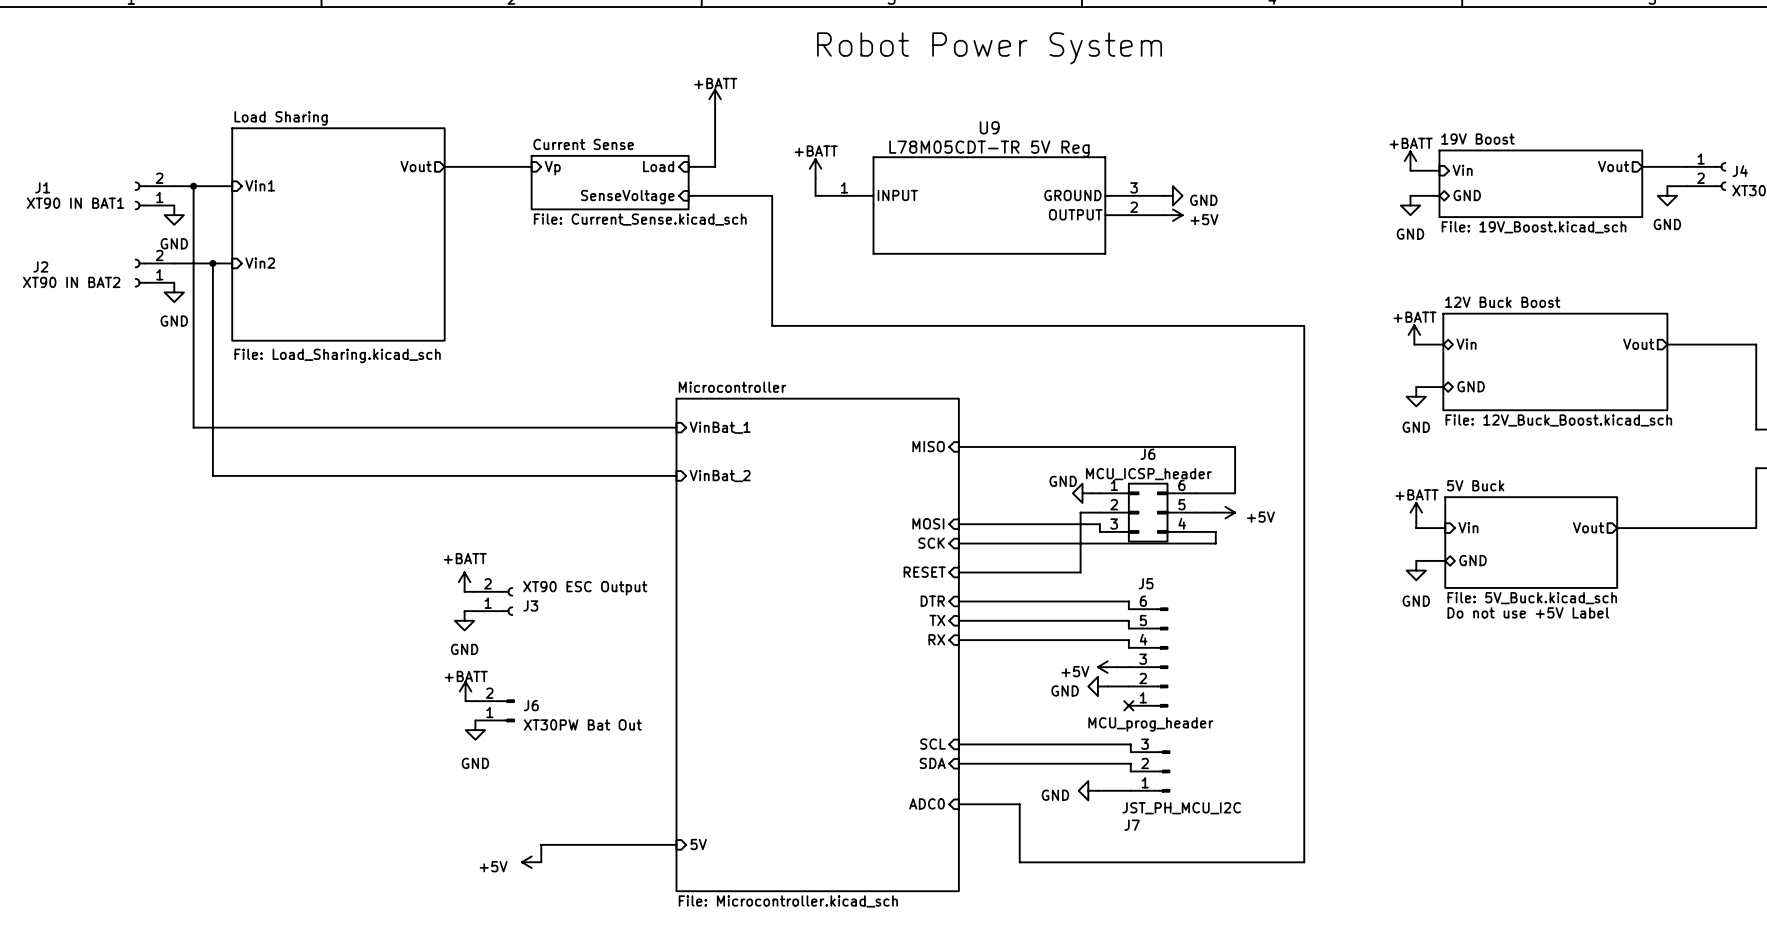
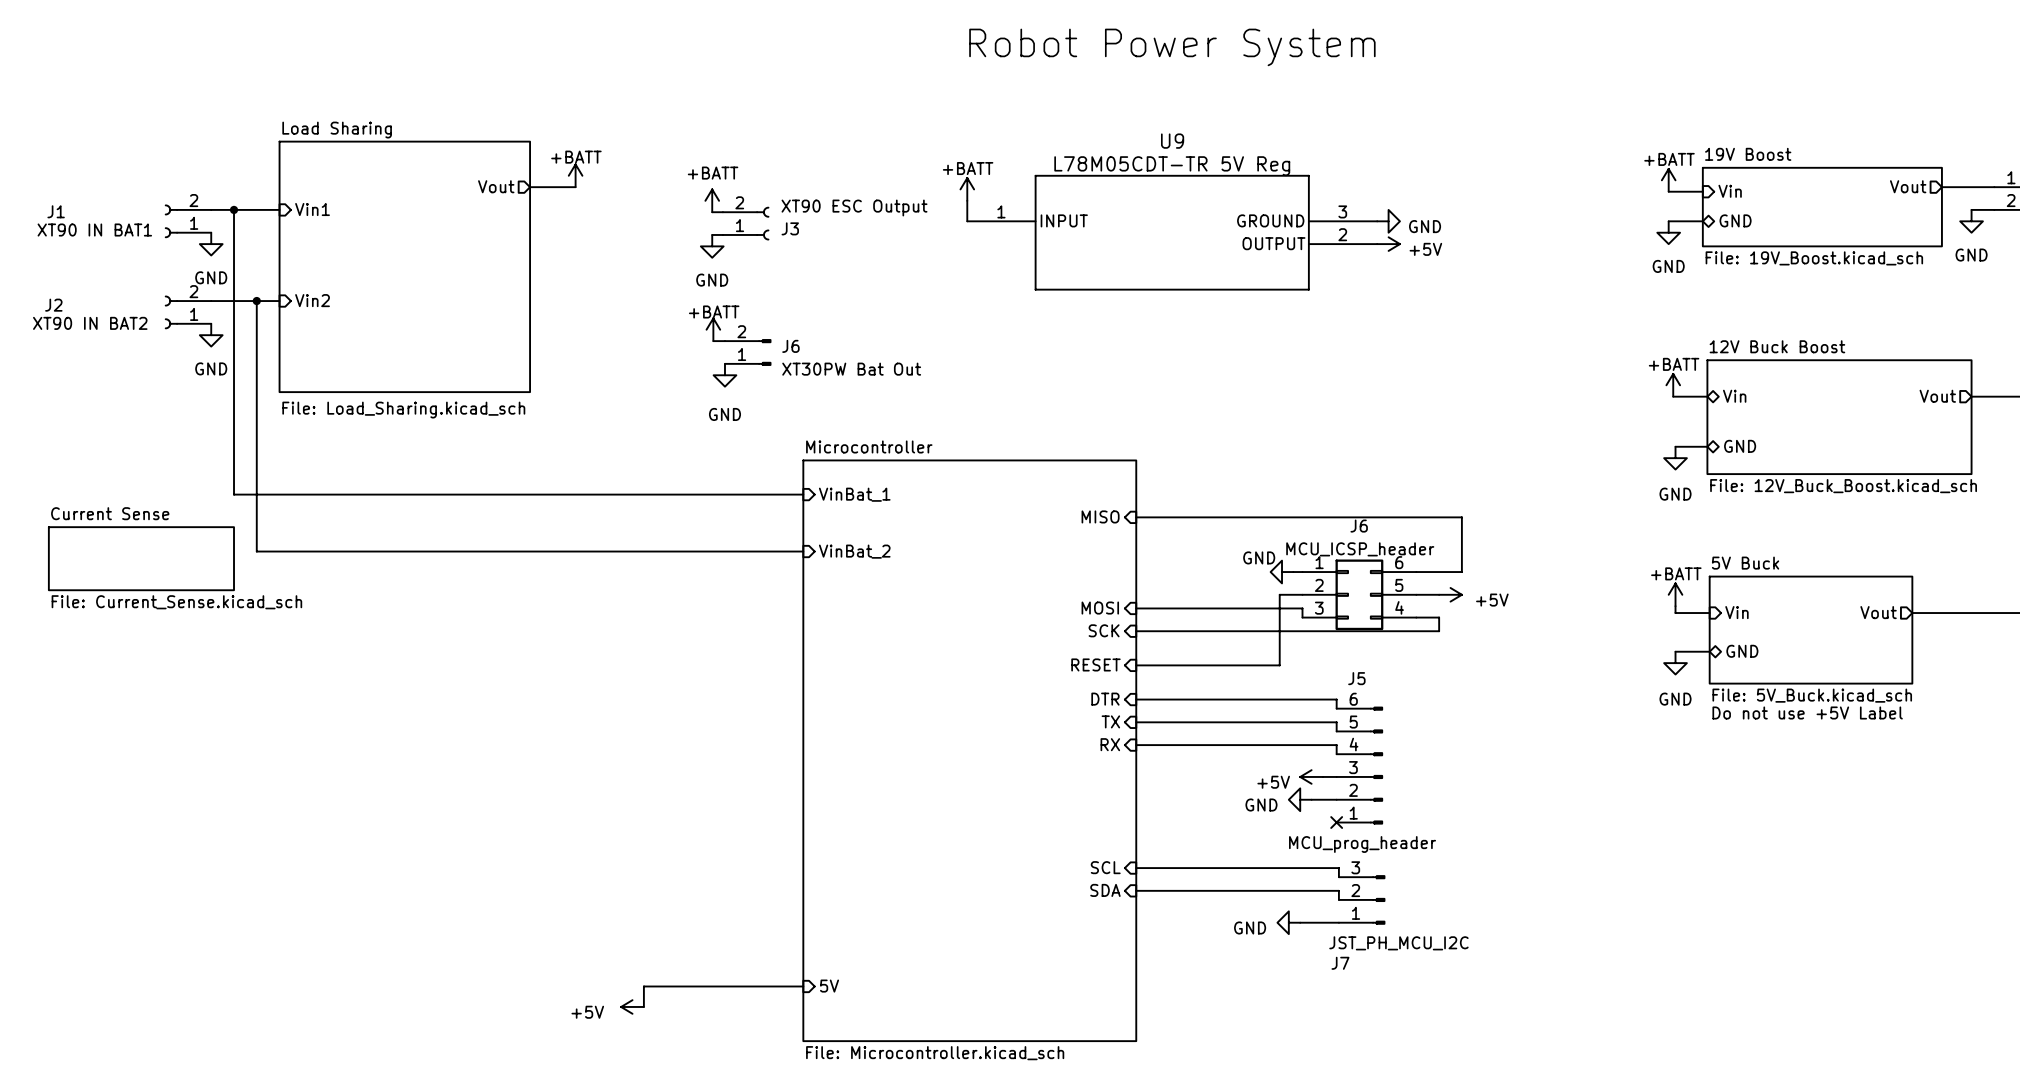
power symbol: +BATT (715, 99) -> none
wire: (715, 108) (715, 166) (688, 166) -> none
power symbol: none -> +BATT (575, 175)
wire: (483, 166) (531, 166) -> none
sheet pin: Load (658, 166) -> none
sheet pin: Vp (552, 168) -> none
power symbol: none -> +BATT (712, 200)
sheet Current Sense: File: Current_Sense.kicad_sch (610, 182) -> none
wire: none -> (712, 212) (722, 212)
wire: (688, 195) (772, 195) (772, 325) (1304, 325) (1304, 862) (1019, 862) (1019, 804) (958, 804) -> none
sheet pin: SenseVoltage (627, 197) -> none
wire: none -> (712, 234) (722, 234)
power symbol: none -> GND (712, 246)
power symbol: none -> +BATT (713, 329)
wire: none -> (713, 341) (724, 341)
J6: none -> XT30PW Bat Out (748, 352)
power symbol: none -> GND (724, 375)
sheet Current Sense: none -> File: Current_Sense.kicad_sch (141, 558)
power symbol: +BATT (464, 582) -> none
wire: (464, 591) (473, 591) -> none
J3 position: (493, 601) -> (746, 223)
wire: (464, 611) (473, 611) -> none
power symbol: GND (464, 620) -> none
power symbol: +BATT (465, 691) -> none
wire: (465, 701) (475, 701) -> none
J6: XT30PW Bat Out (495, 710) -> none
power symbol: GND (475, 730) -> none
sheet pin: ADC0 (927, 803) -> none

